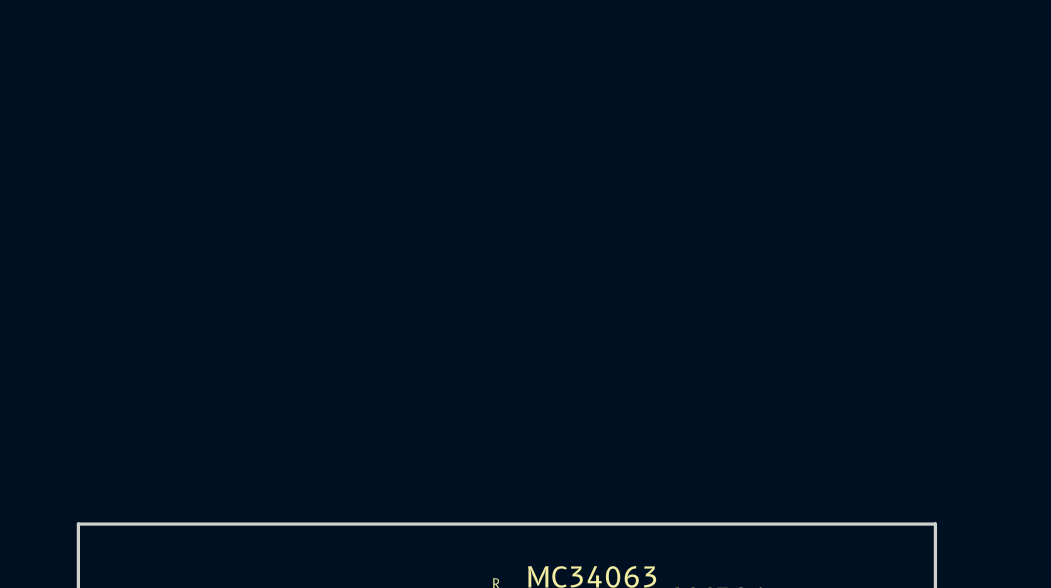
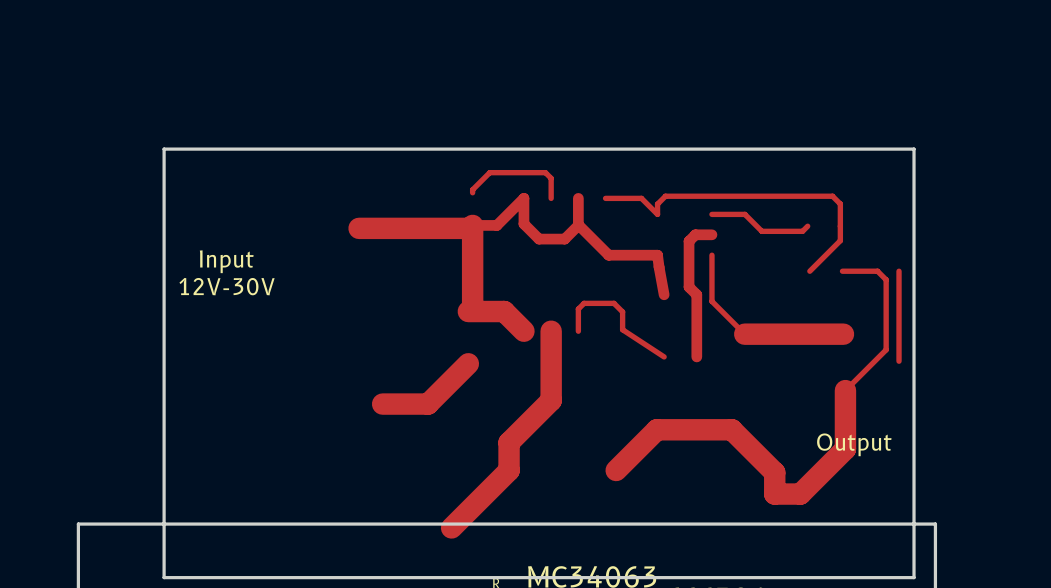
board edge: none -> (164, 149) (914, 149) (914, 577) (164, 577) (164, 149)
track: none -> (472, 192) (472, 189) (489, 172) (545, 172) (551, 178) (551, 198)
track: none -> (578, 198) (578, 225)
track: none -> (605, 198) (641, 198) (657, 214) (657, 204) (665, 196) (832, 196) (840, 203) (840, 240) (809, 271)
track: none -> (711, 214) (744, 214) (761, 231) (802, 231) (807, 226)
track: none -> (472, 225) (469, 228) (359, 228)
track: none -> (472, 225) (496, 225) (523, 198) (523, 223) (539, 239) (564, 239) (578, 225)
track: none -> (472, 225) (472, 307) (468, 311) (504, 311) (523, 331)
track: none -> (578, 225) (608, 255) (657, 255) (664, 294)
track: none -> (711, 234) (695, 234) (689, 241) (689, 287) (696, 294) (696, 356)
track: none -> (711, 255) (711, 301) (744, 334) (843, 334) (845, 336)
text: none -> Input (226, 261)
track: none -> (842, 271) (877, 271) (886, 279) (886, 349) (838, 397)
track: none -> (899, 271) (899, 361)
text: none -> 12V-30V (227, 286)
track: none -> (551, 331) (551, 400) (509, 442) (509, 470) (451, 527) (451, 532)
track: none -> (578, 331) (578, 309) (584, 303) (614, 303) (622, 311) (622, 329) (664, 356)
track: none -> (468, 363) (428, 404) (382, 404)
track: none -> (845, 390) (845, 449) (800, 494) (774, 494) (774, 472) (731, 429) (656, 429) (616, 470)
text: none -> Output (854, 444)

